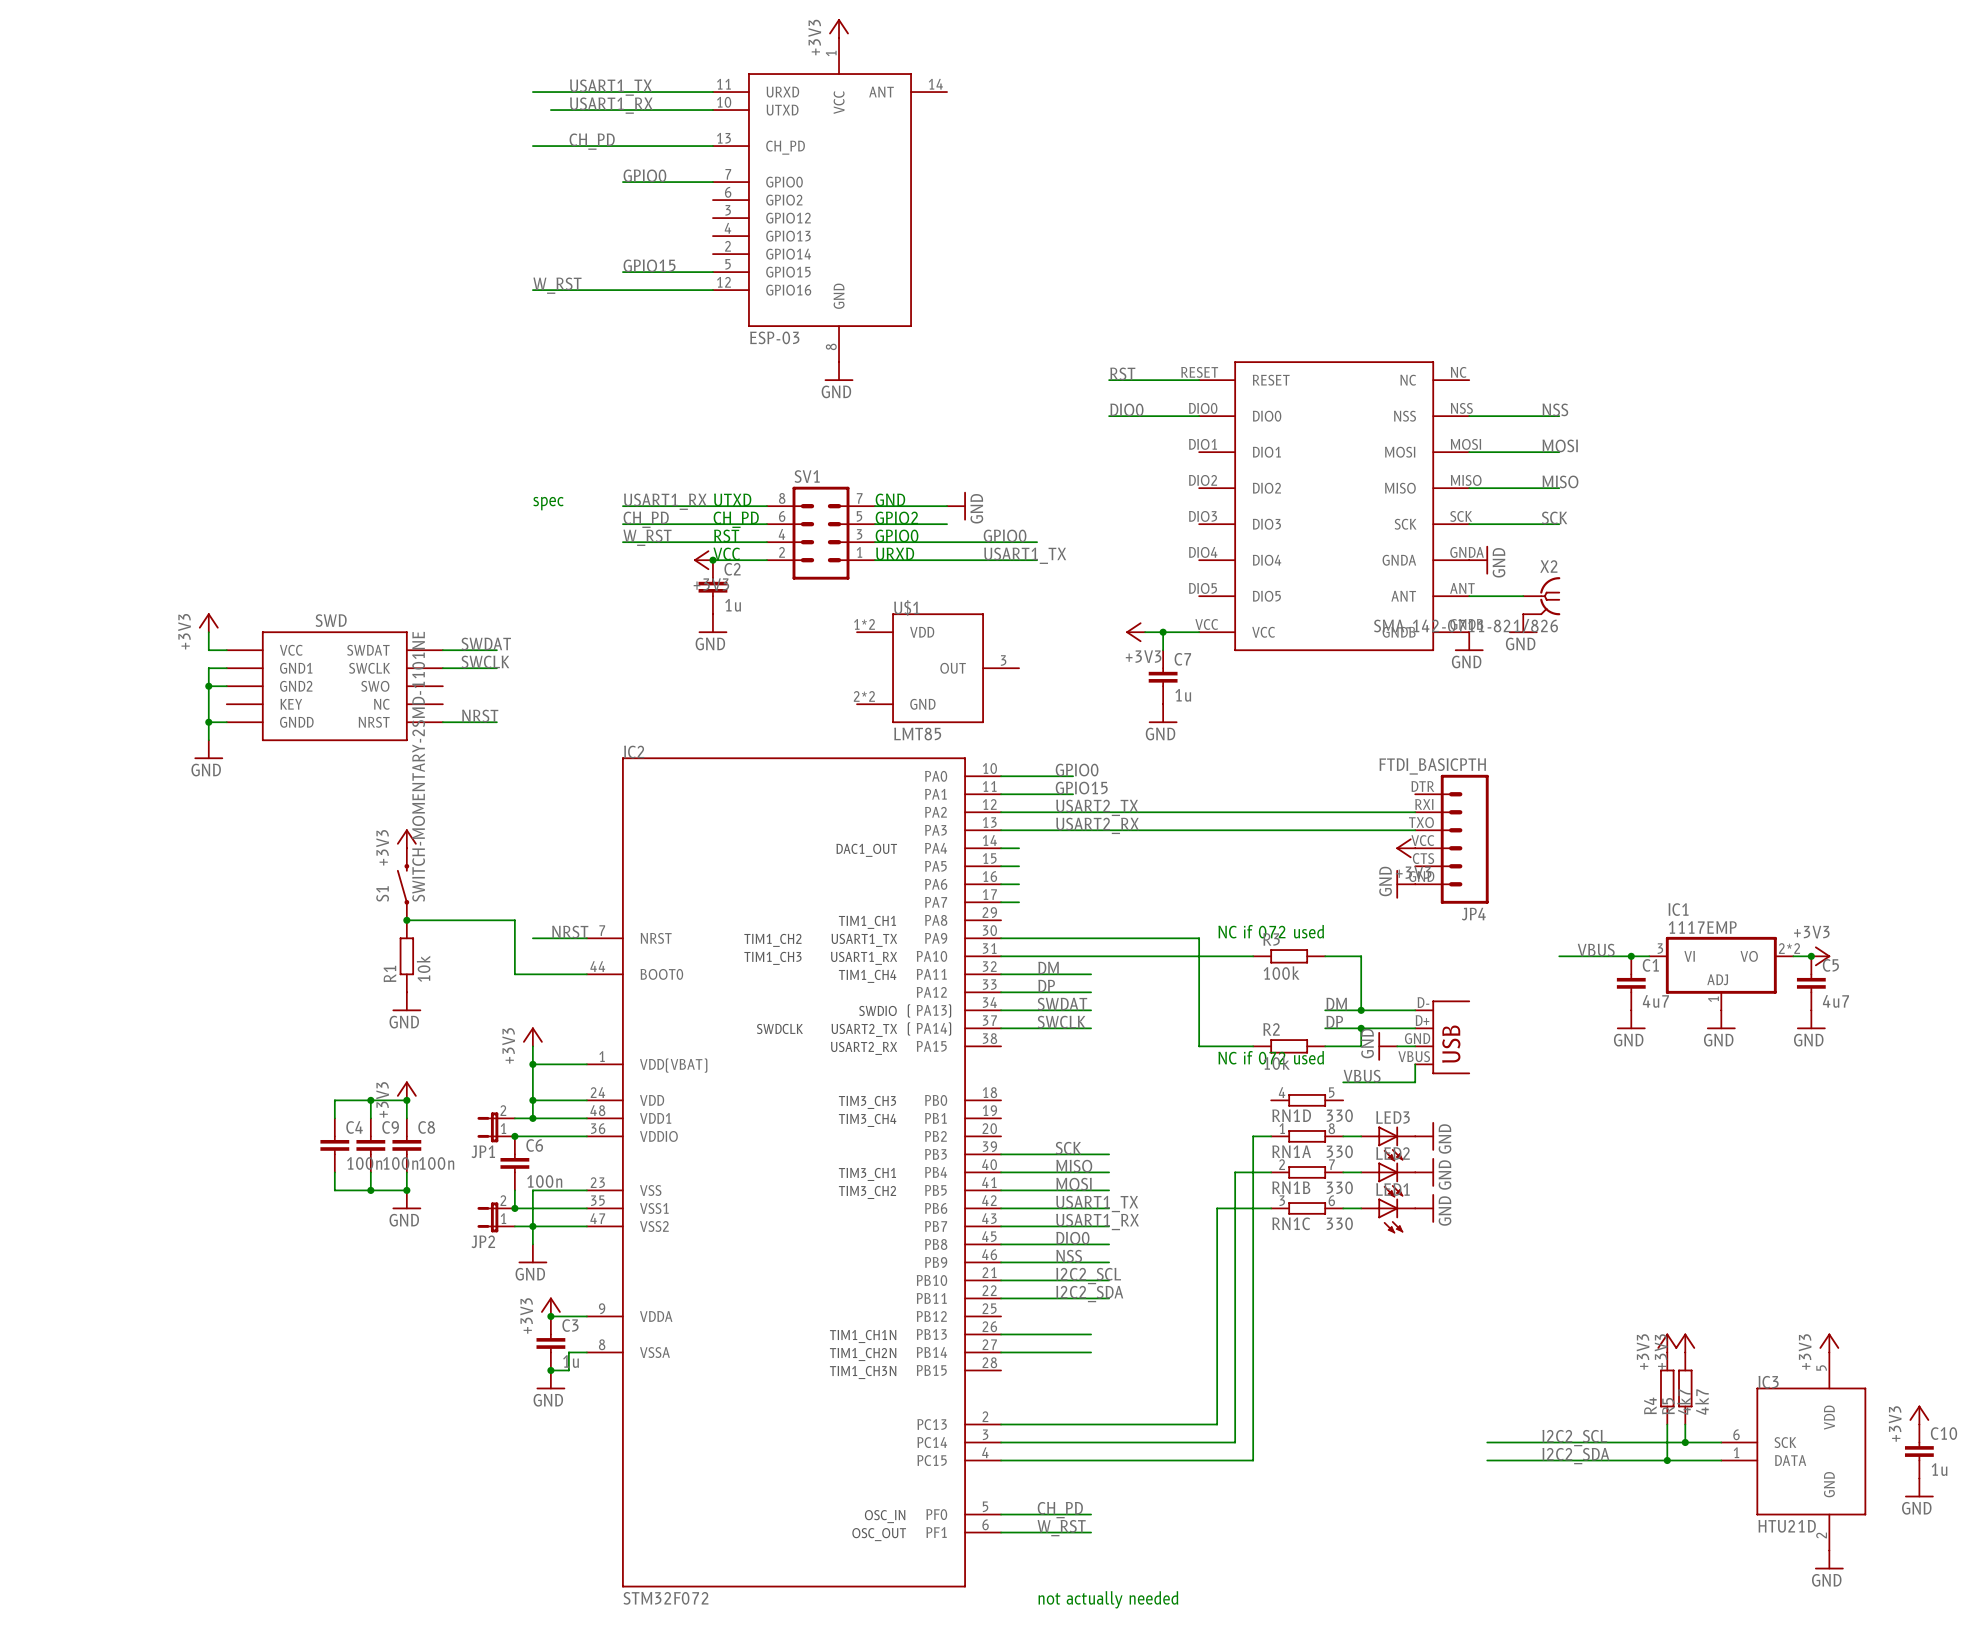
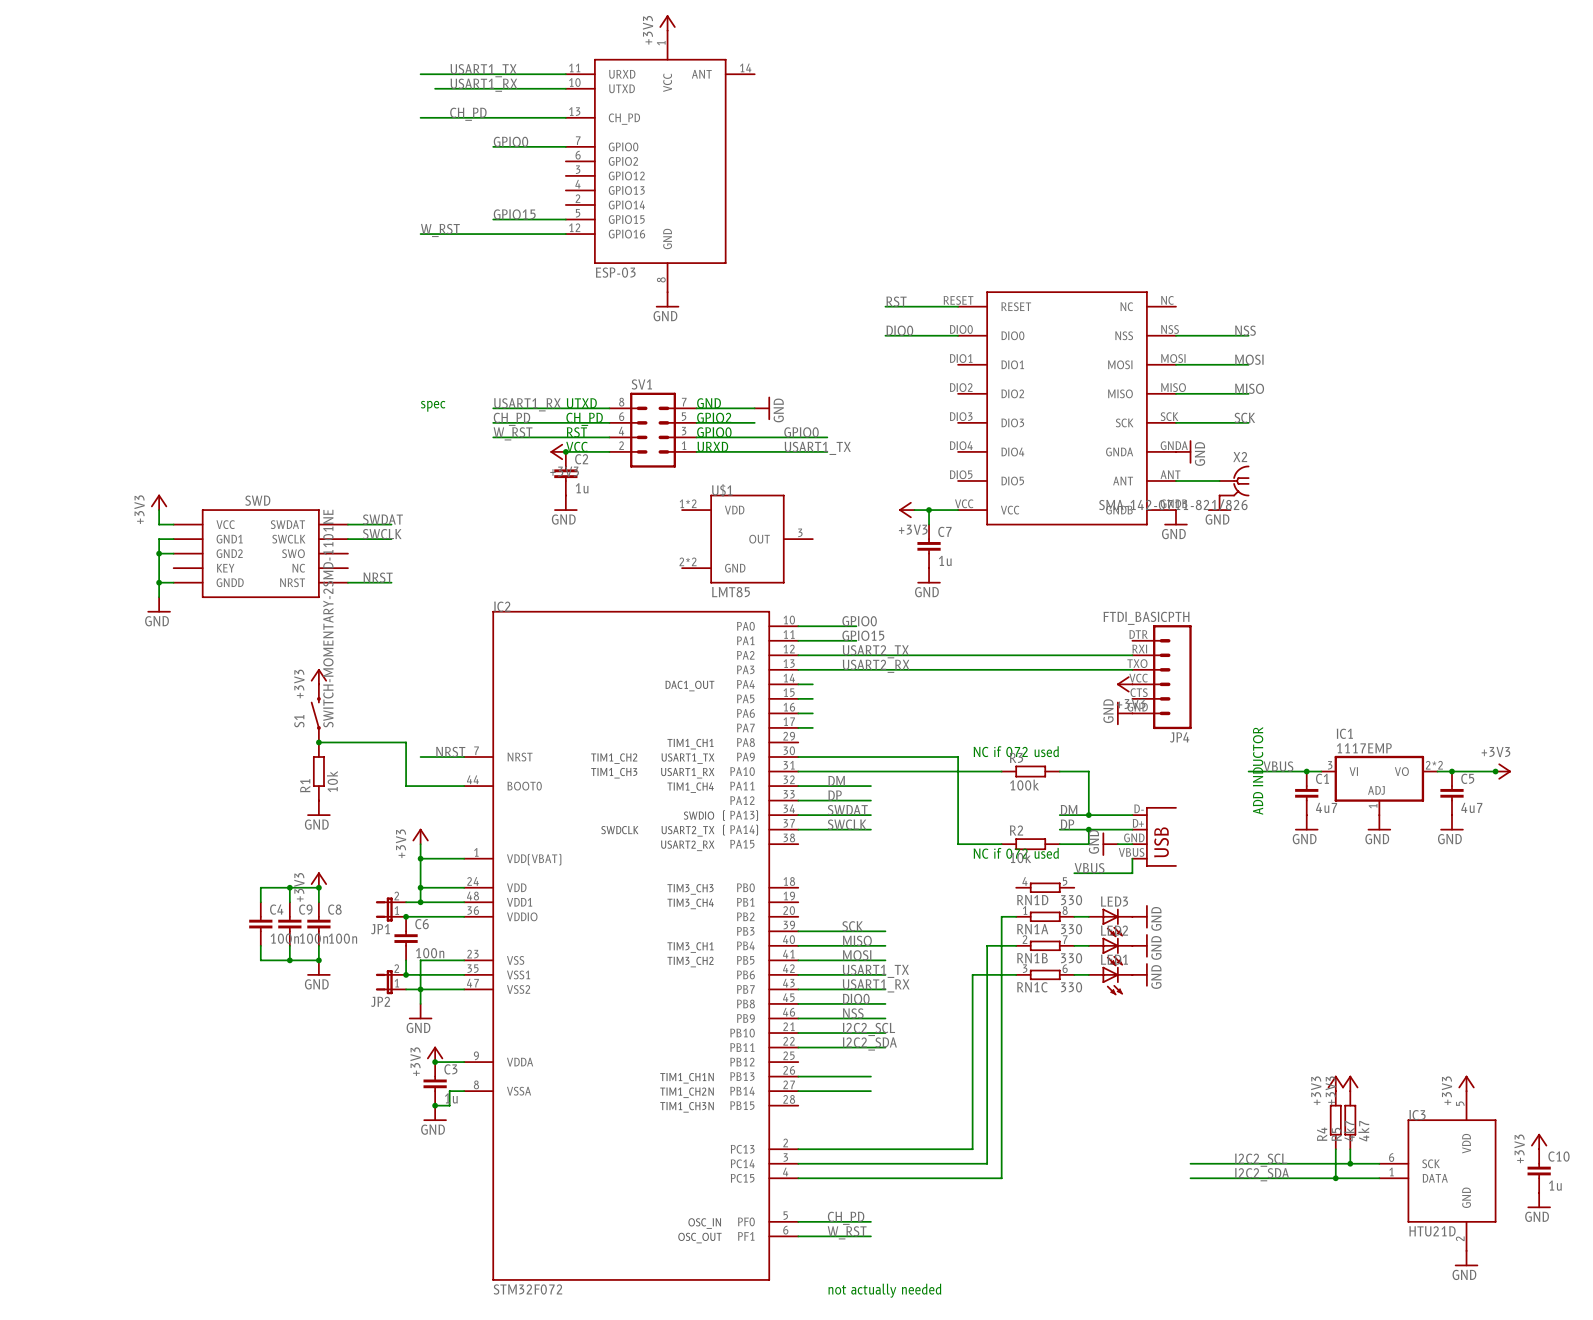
text: none -> ADD INDUCTOR (1258, 770)
wire: none -> (1451, 771) (1495, 771)
power symbol position: +3V3 (1820, 956) -> +3V3 (1503, 771)
junction: none -> (1495, 771)

